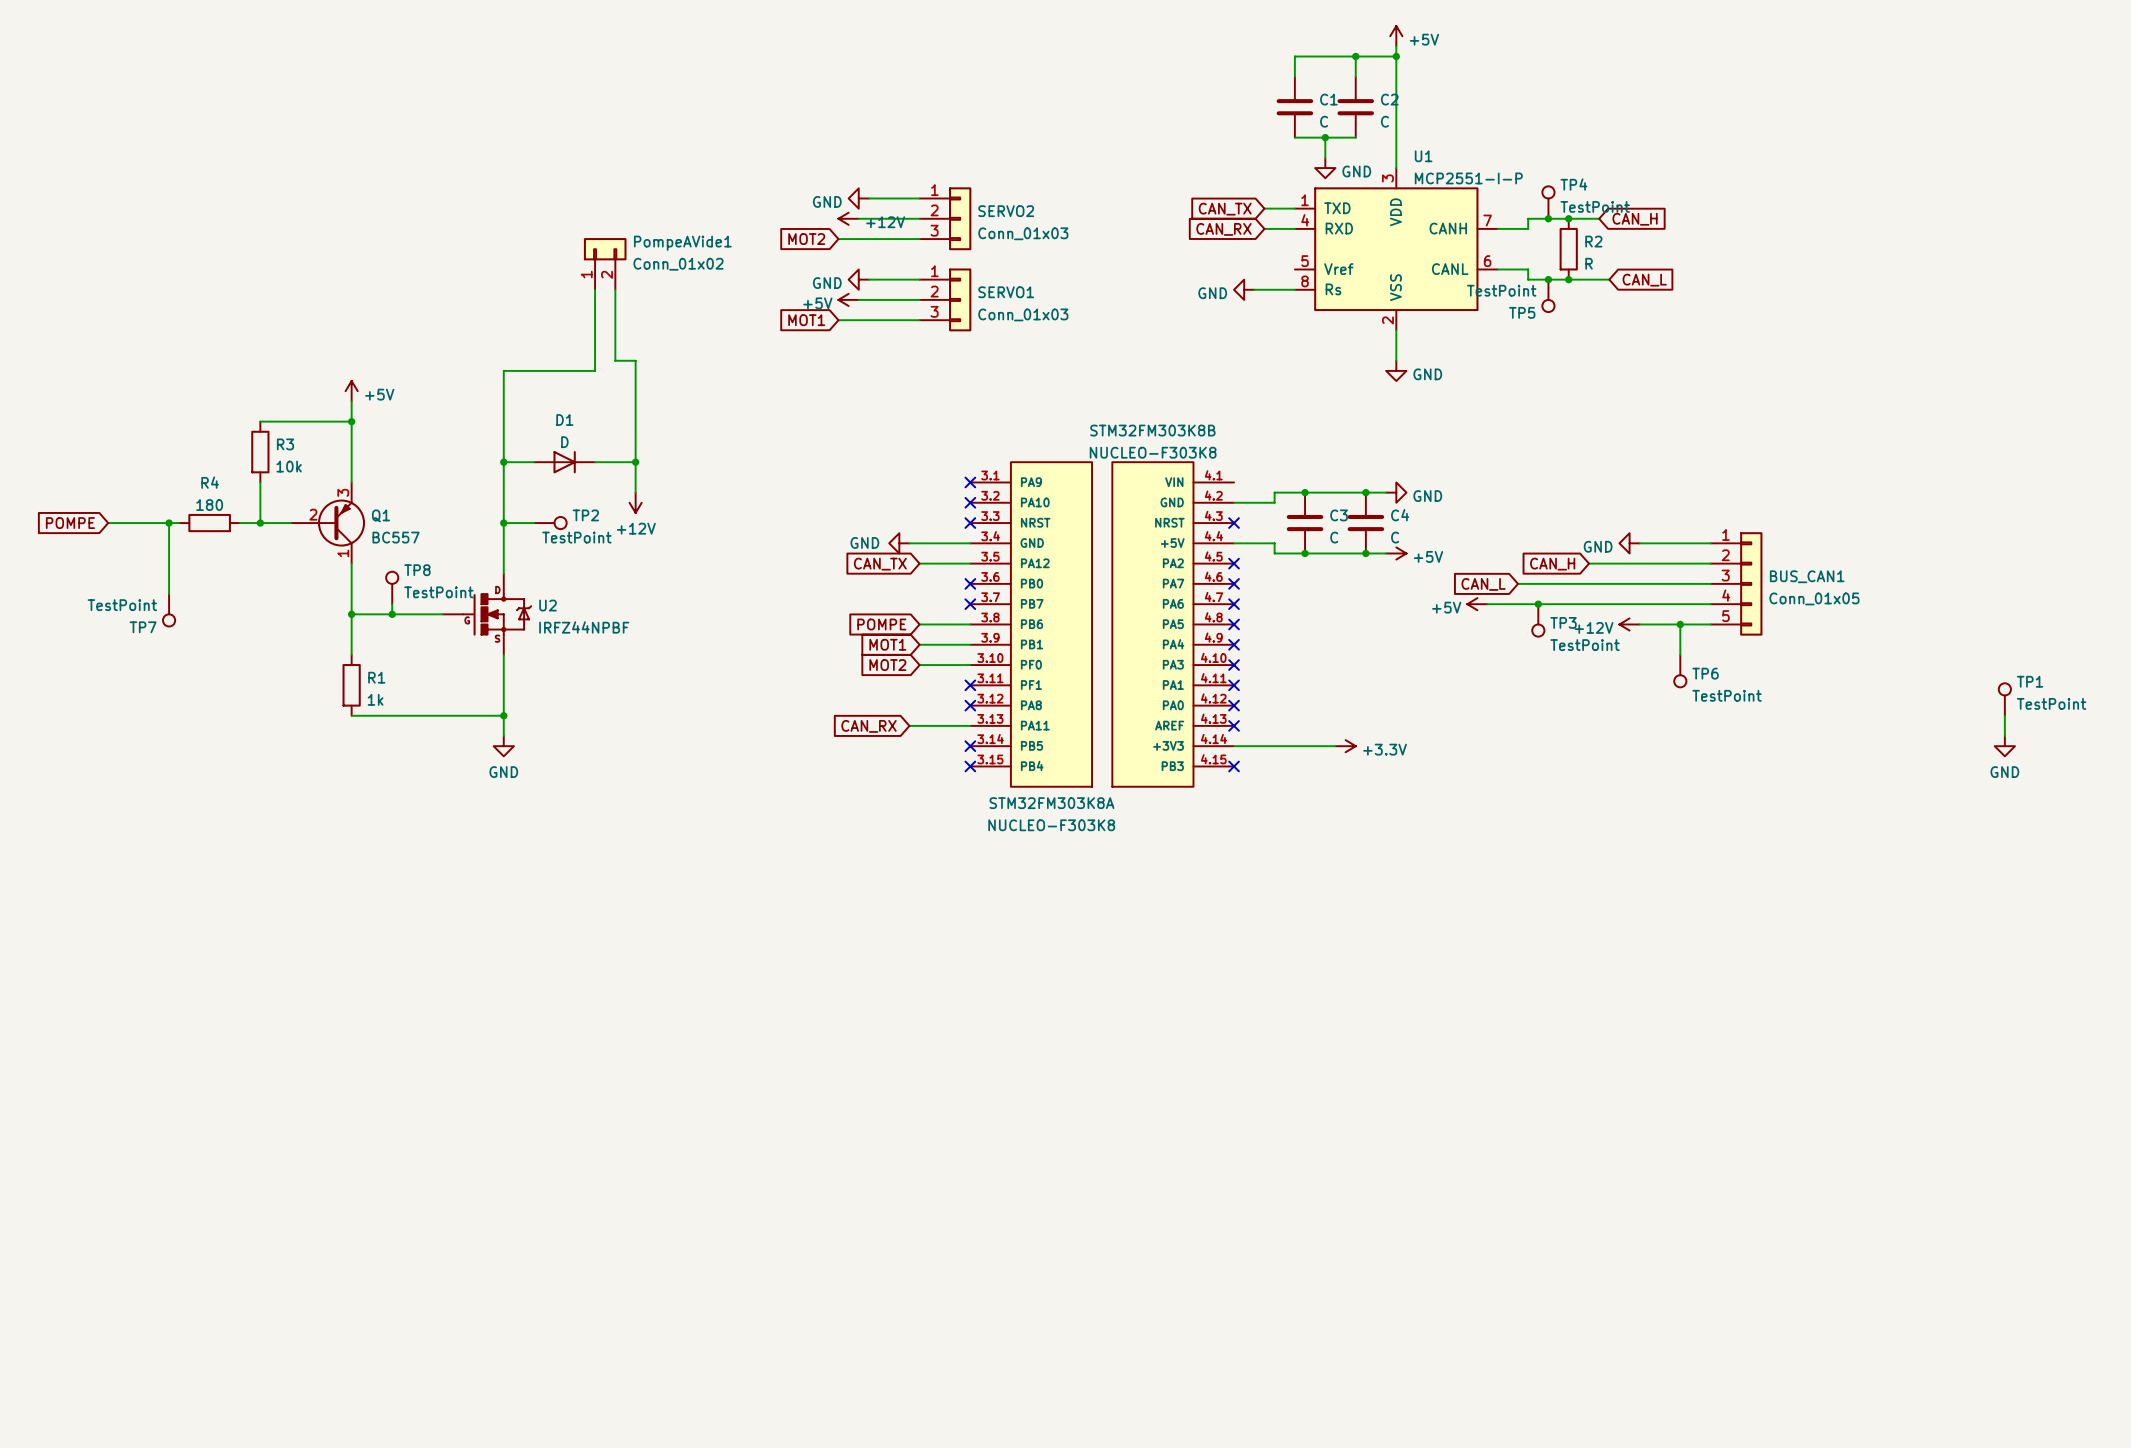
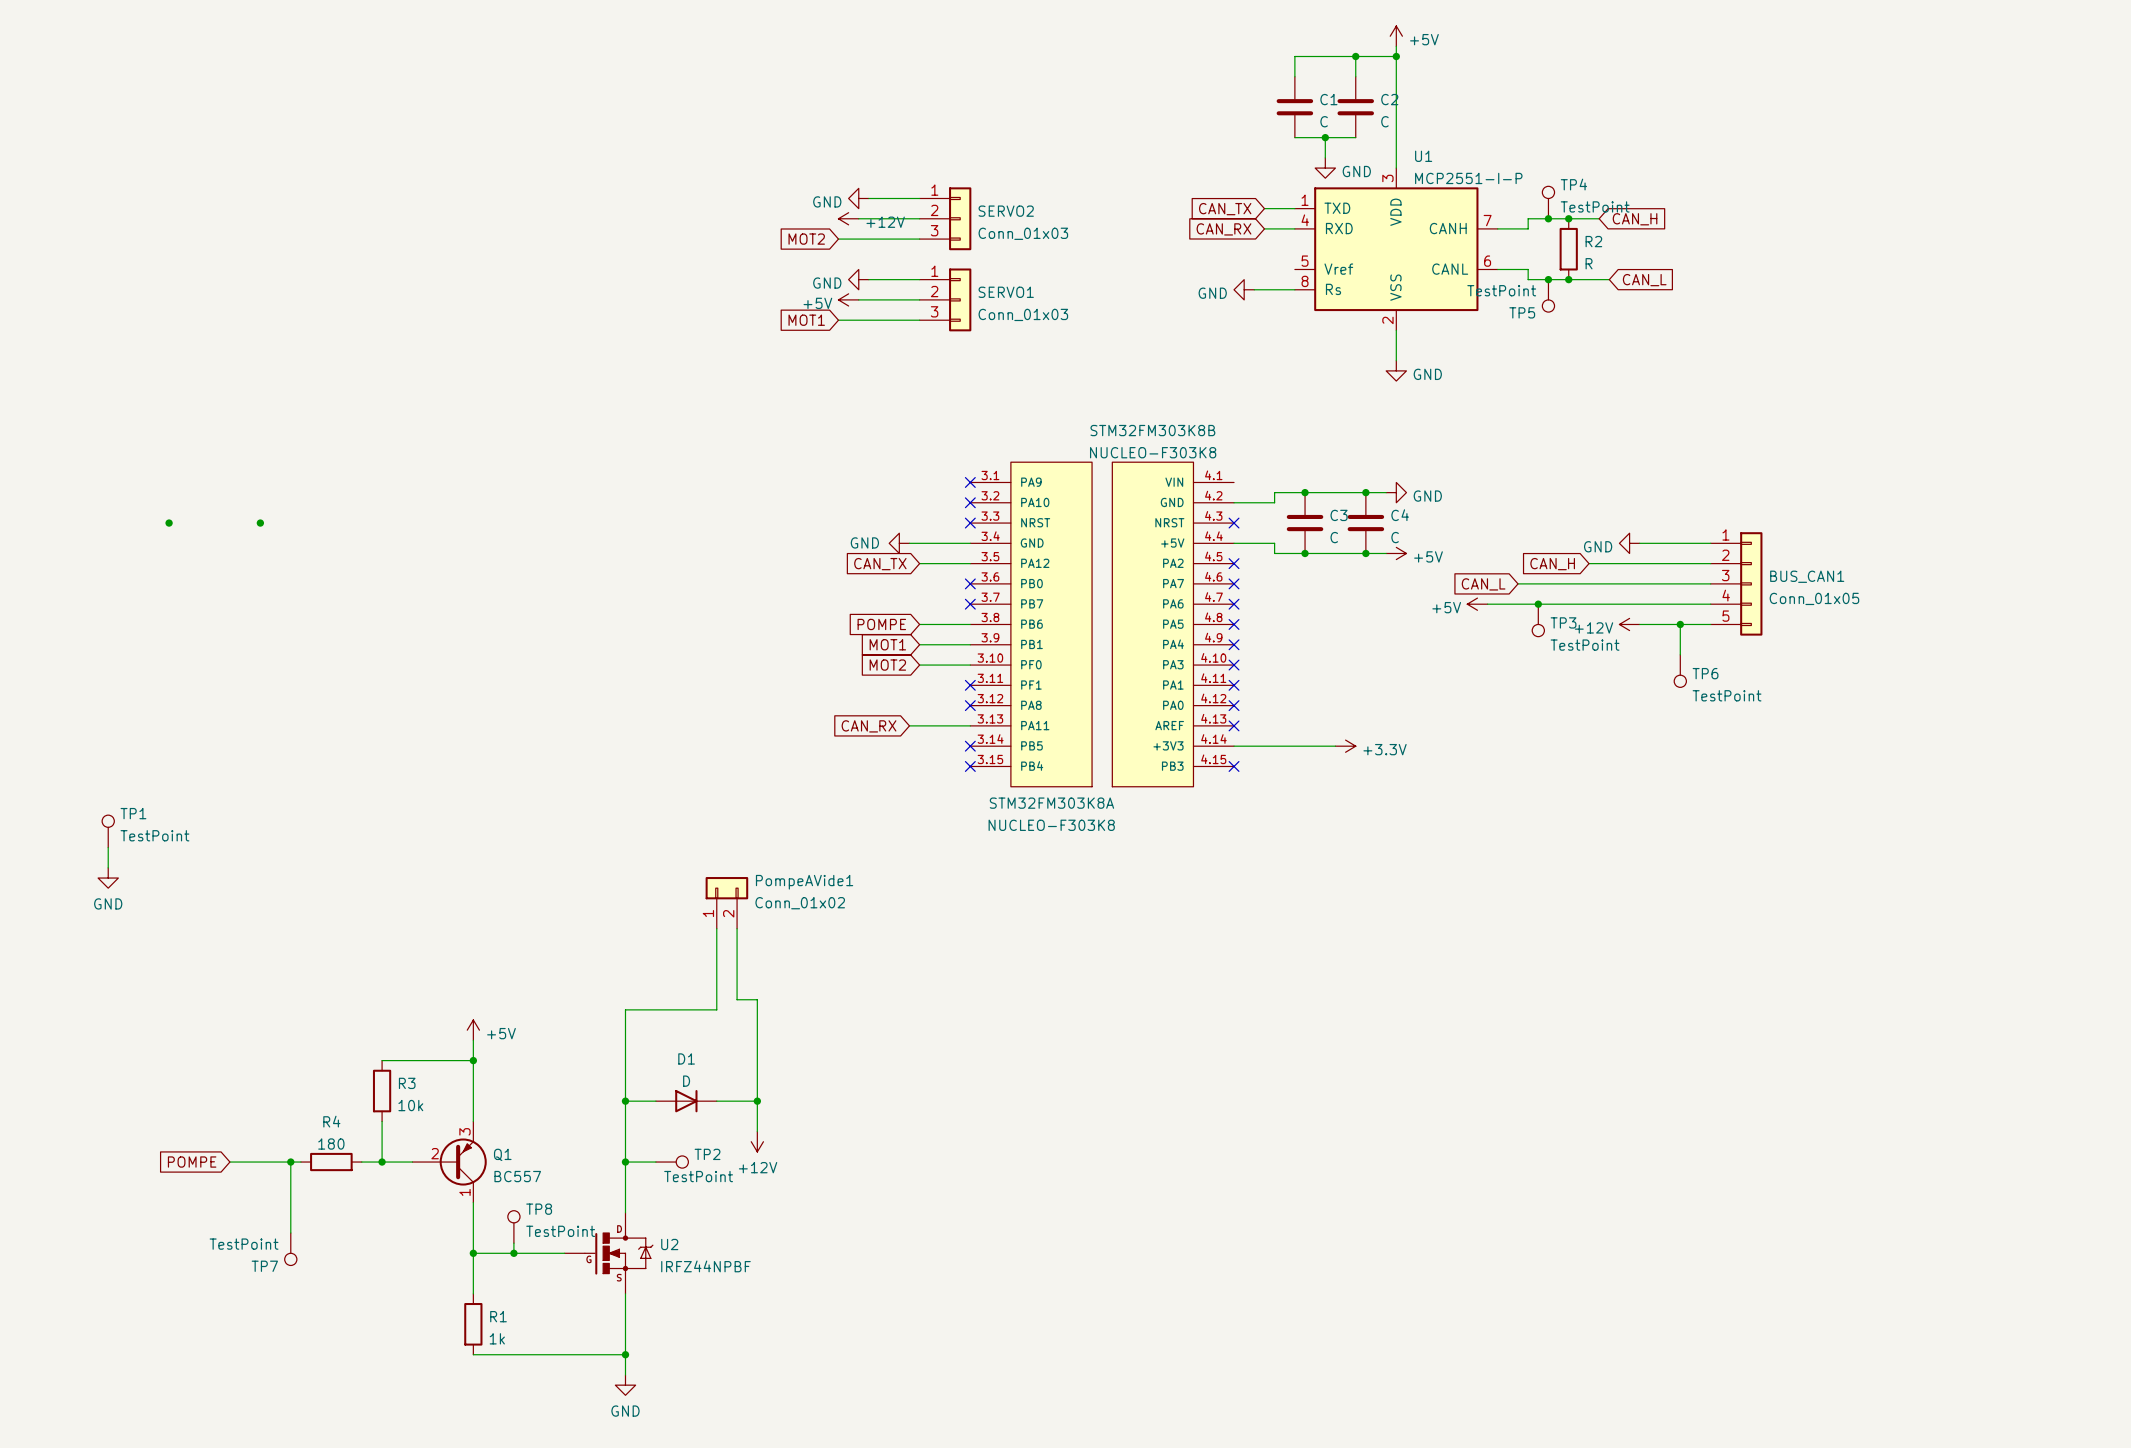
PompeAVide1 position: (605, 263) -> (726, 902)
wire: (595, 289) (595, 370) (503, 370) (503, 573) -> none
wire: (615, 289) (615, 360) (635, 360) (635, 492) -> none
power symbol: +5V (351, 391) -> none
wire: (351, 401) (351, 482) -> none
wire: (260, 421) (351, 421) -> none
junction: (351, 421) -> none
R3 position: (260, 452) -> (382, 1091)
wire: (503, 462) (534, 462) -> none
junction: (503, 462) -> none
D1 position: (564, 462) -> (686, 1101)
wire: (595, 462) (635, 462) -> none
junction: (635, 462) -> none
wire: (260, 482) (260, 523) -> none
power symbol: +12V (635, 502) -> none
global label: POMPE (70, 523) -> none
wire: (108, 523) (179, 523) -> none
wire: (169, 523) (169, 594) -> none
R4 position: (209, 523) -> (331, 1162)
wire: (240, 523) (290, 523) -> none
Q1 position: (327, 523) -> (449, 1162)
wire: (503, 523) (534, 523) -> none
junction: (503, 523) -> none
TP2 position: (550, 523) -> (672, 1162)
wire: (351, 563) (351, 654) -> none
TP8 position: (392, 587) -> (513, 1226)
wire: (392, 604) (392, 614) -> none
TP7 position: (169, 610) -> (290, 1249)
wire: (351, 614) (442, 614) -> none
junction: (351, 614) -> none
junction: (392, 614) -> none
U2 position: (487, 614) -> (609, 1253)
wire: (503, 654) (503, 736) -> none
R1 position: (351, 685) -> (473, 1324)
TP1 position: (2004, 699) -> (108, 831)
wire: (351, 715) (503, 715) -> none
junction: (503, 715) -> none
wire: (2004, 715) (2004, 736) -> none
power symbol: GND (503, 746) -> none
power symbol: GND (2004, 746) -> none
wire: none -> (108, 847) (108, 867)
power symbol: none -> GND (108, 878)
wire: none -> (716, 928) (716, 1009) (625, 1009) (625, 1212)
wire: none -> (737, 928) (737, 999) (757, 999) (757, 1131)
power symbol: none -> +5V (473, 1030)
wire: none -> (473, 1040) (473, 1121)
wire: none -> (382, 1060) (473, 1060)
junction: none -> (473, 1060)
wire: none -> (625, 1101) (655, 1101)
junction: none -> (625, 1101)
wire: none -> (716, 1101) (757, 1101)
junction: none -> (757, 1101)
wire: none -> (382, 1121) (382, 1162)
power symbol: none -> +12V (757, 1141)
global label: none -> POMPE (192, 1162)
wire: none -> (229, 1162) (300, 1162)
wire: none -> (290, 1162) (290, 1233)
junction: none -> (290, 1162)
wire: none -> (361, 1162) (412, 1162)
junction: none -> (382, 1162)
wire: none -> (625, 1162) (655, 1162)
junction: none -> (625, 1162)
wire: none -> (473, 1202) (473, 1293)
wire: none -> (513, 1243) (513, 1253)
wire: none -> (473, 1253) (564, 1253)
junction: none -> (473, 1253)
junction: none -> (513, 1253)
wire: none -> (625, 1293) (625, 1375)
wire: none -> (473, 1354) (625, 1354)
junction: none -> (625, 1354)
power symbol: none -> GND (625, 1385)

